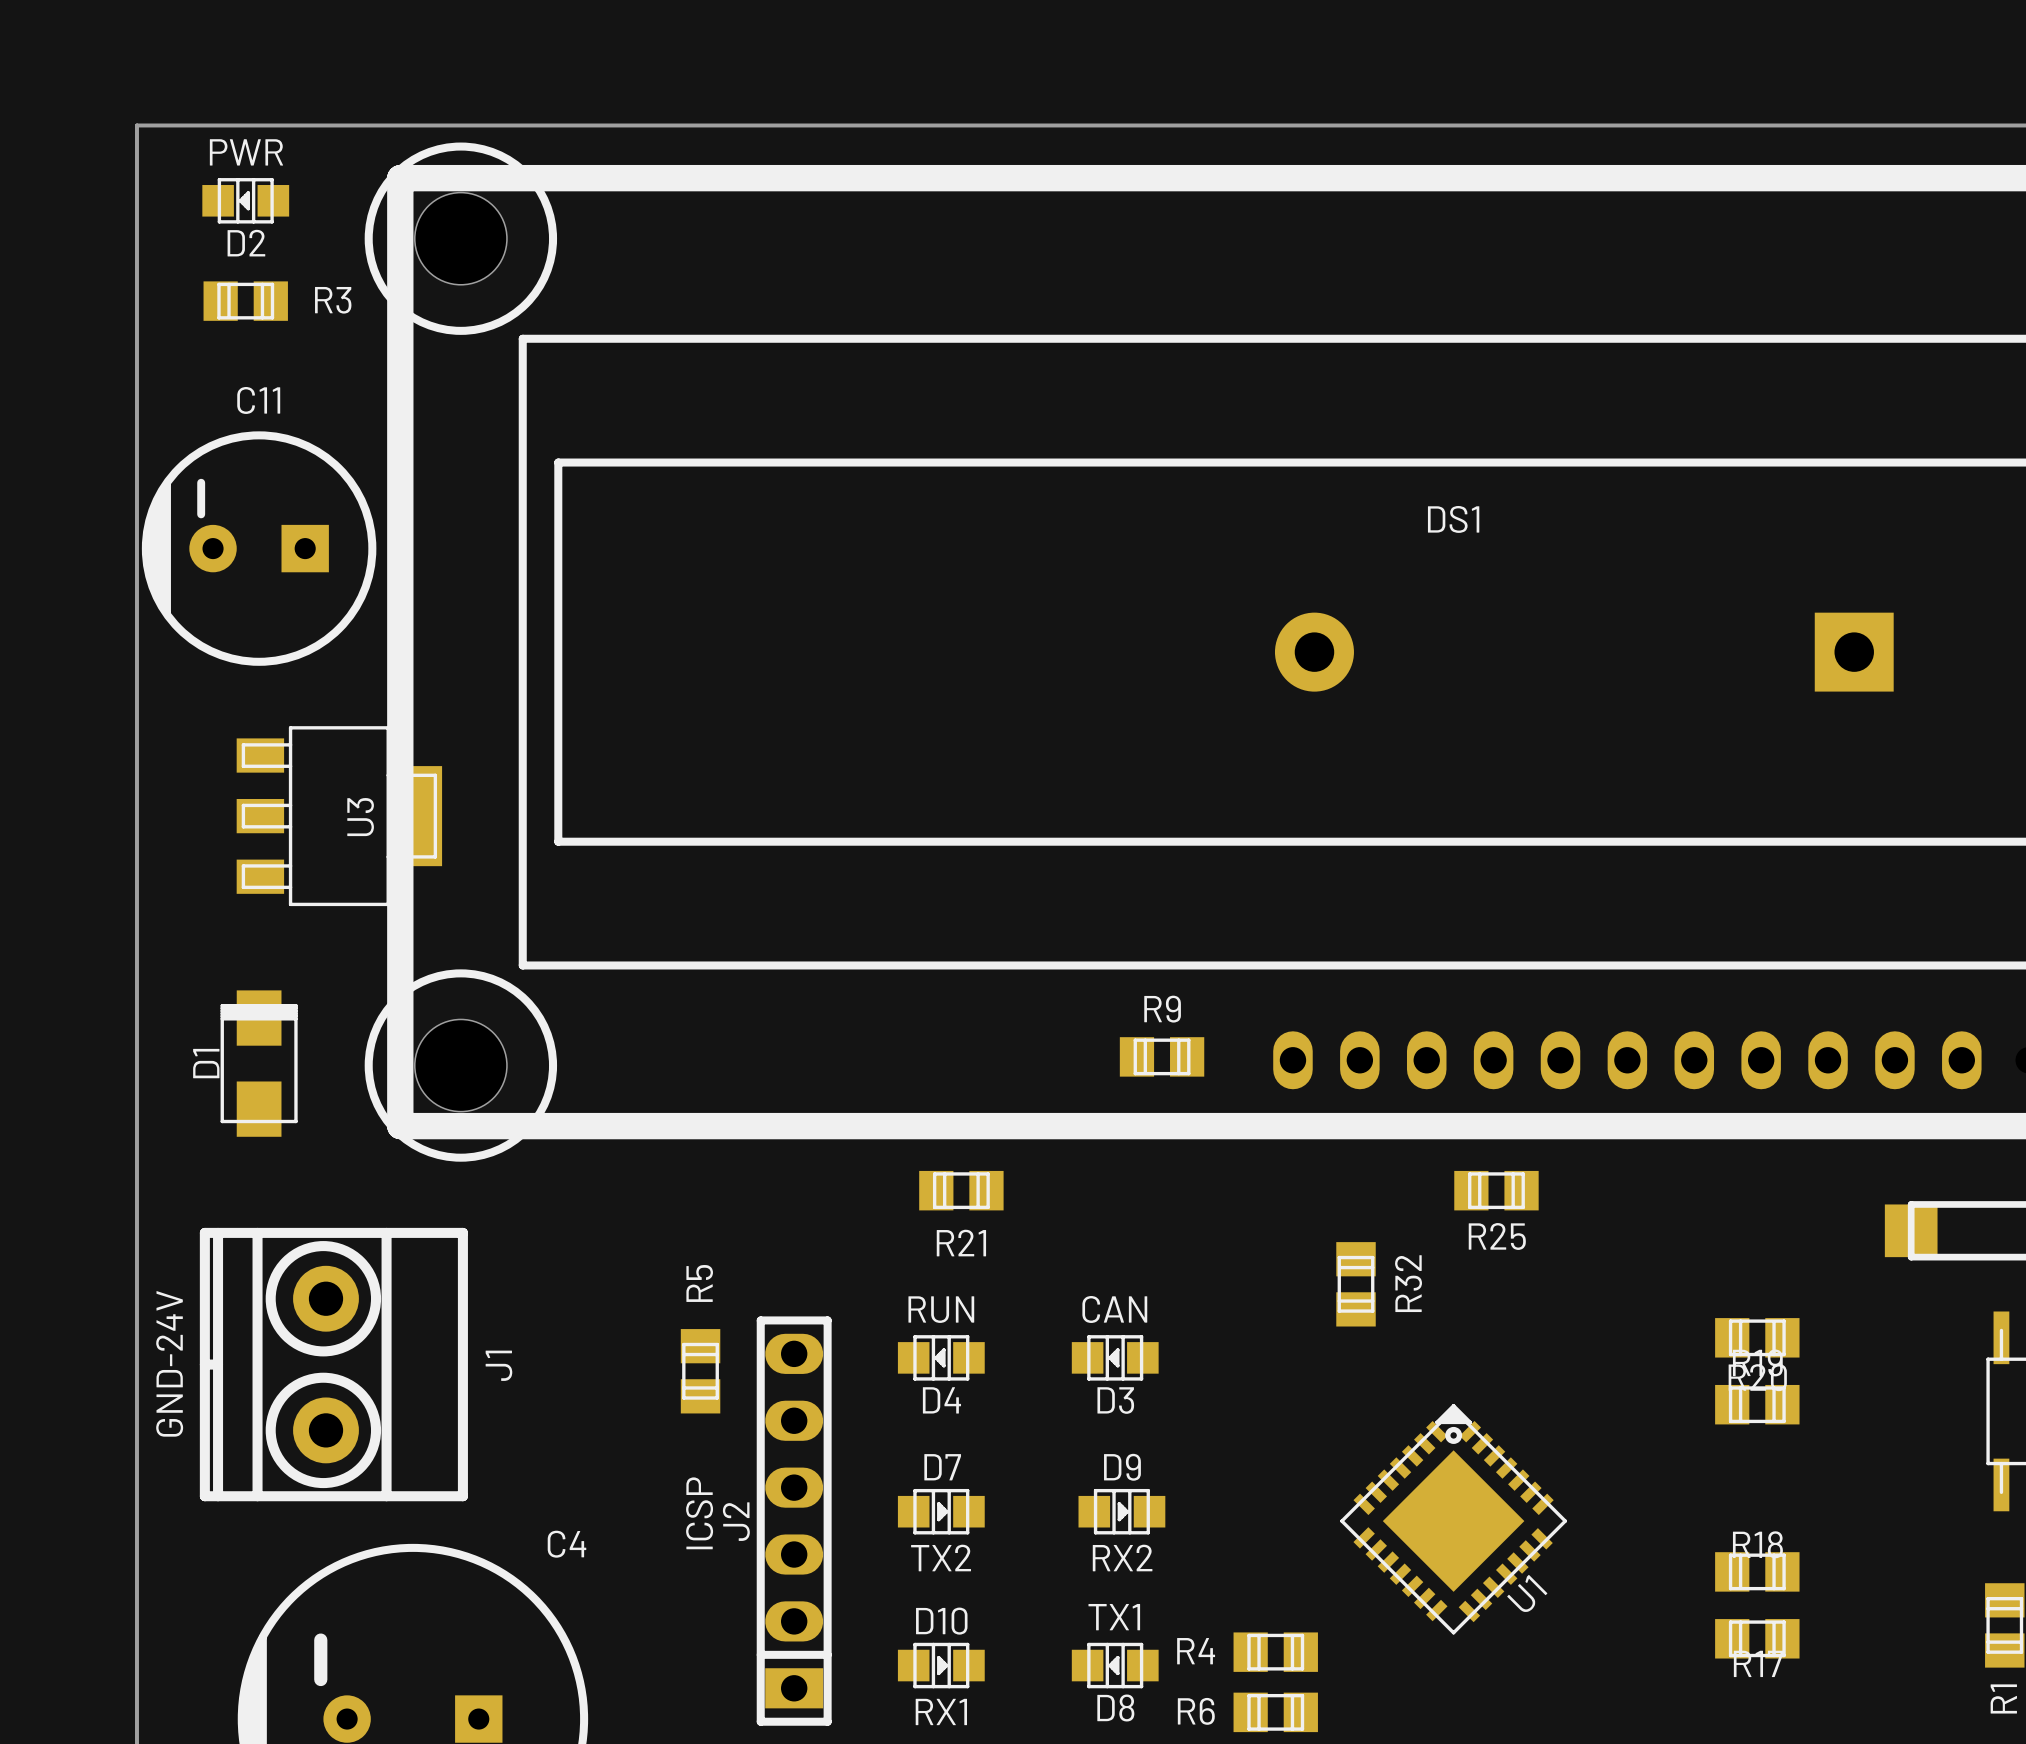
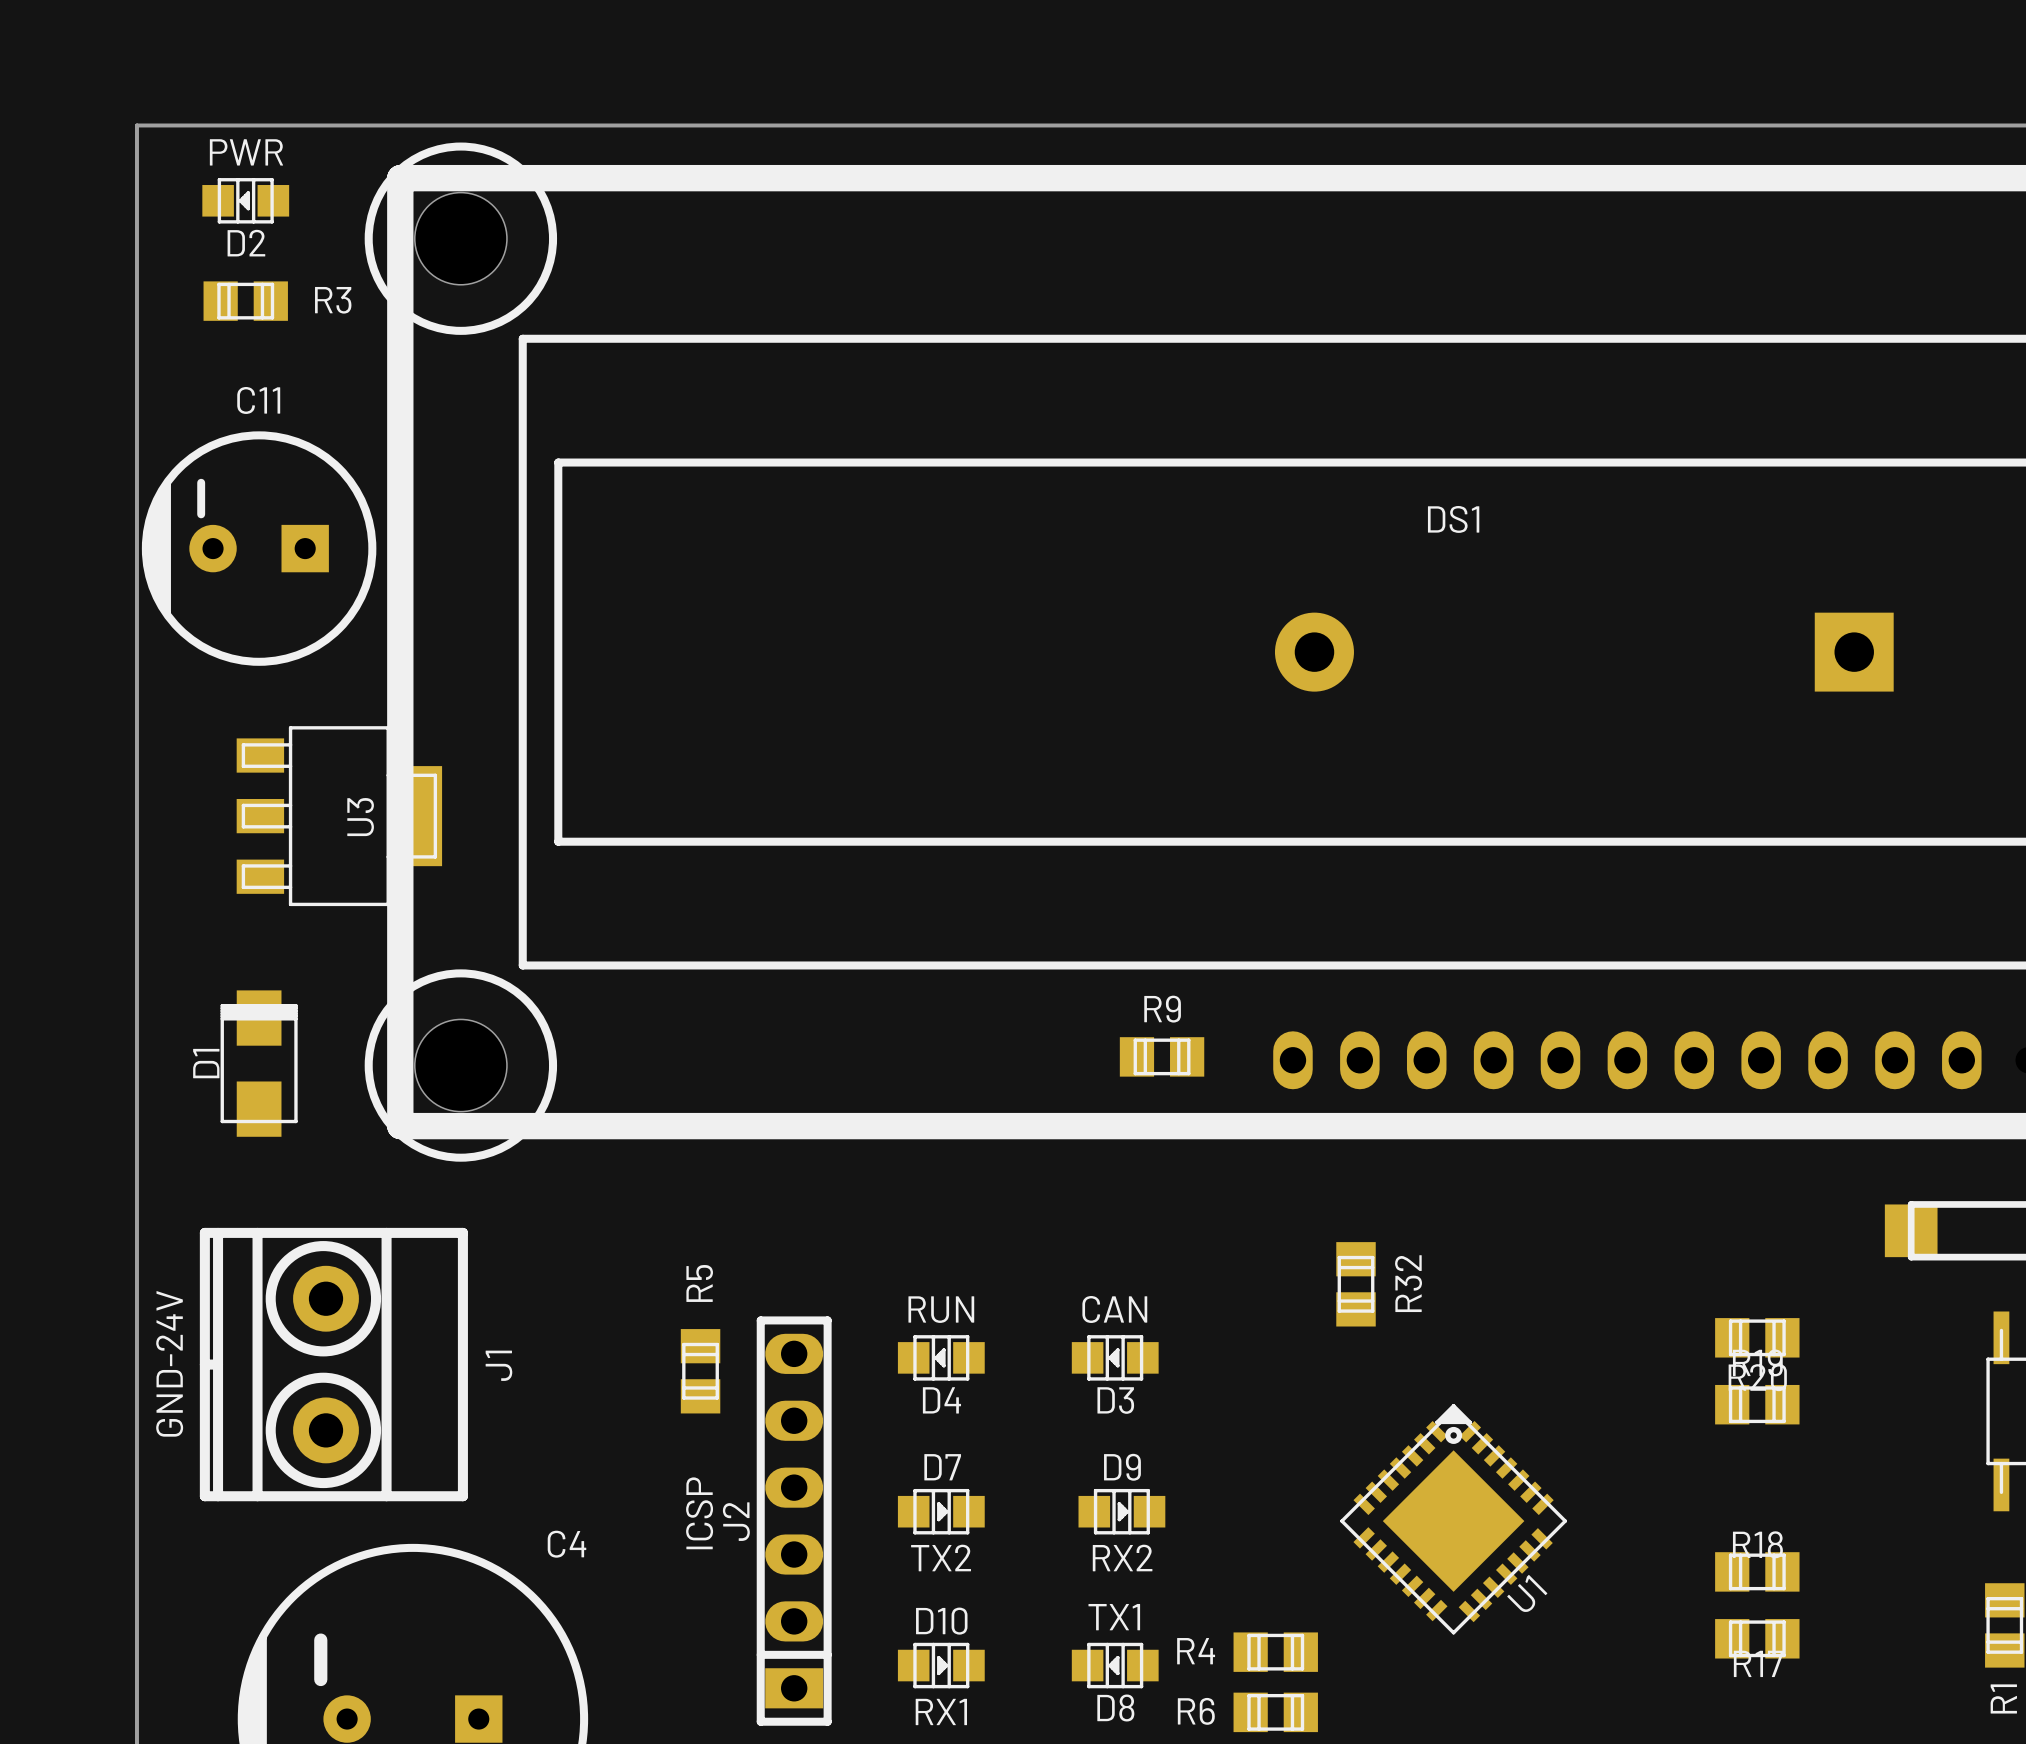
R21: (961, 1190) -> none
R25: (1496, 1190) -> none

